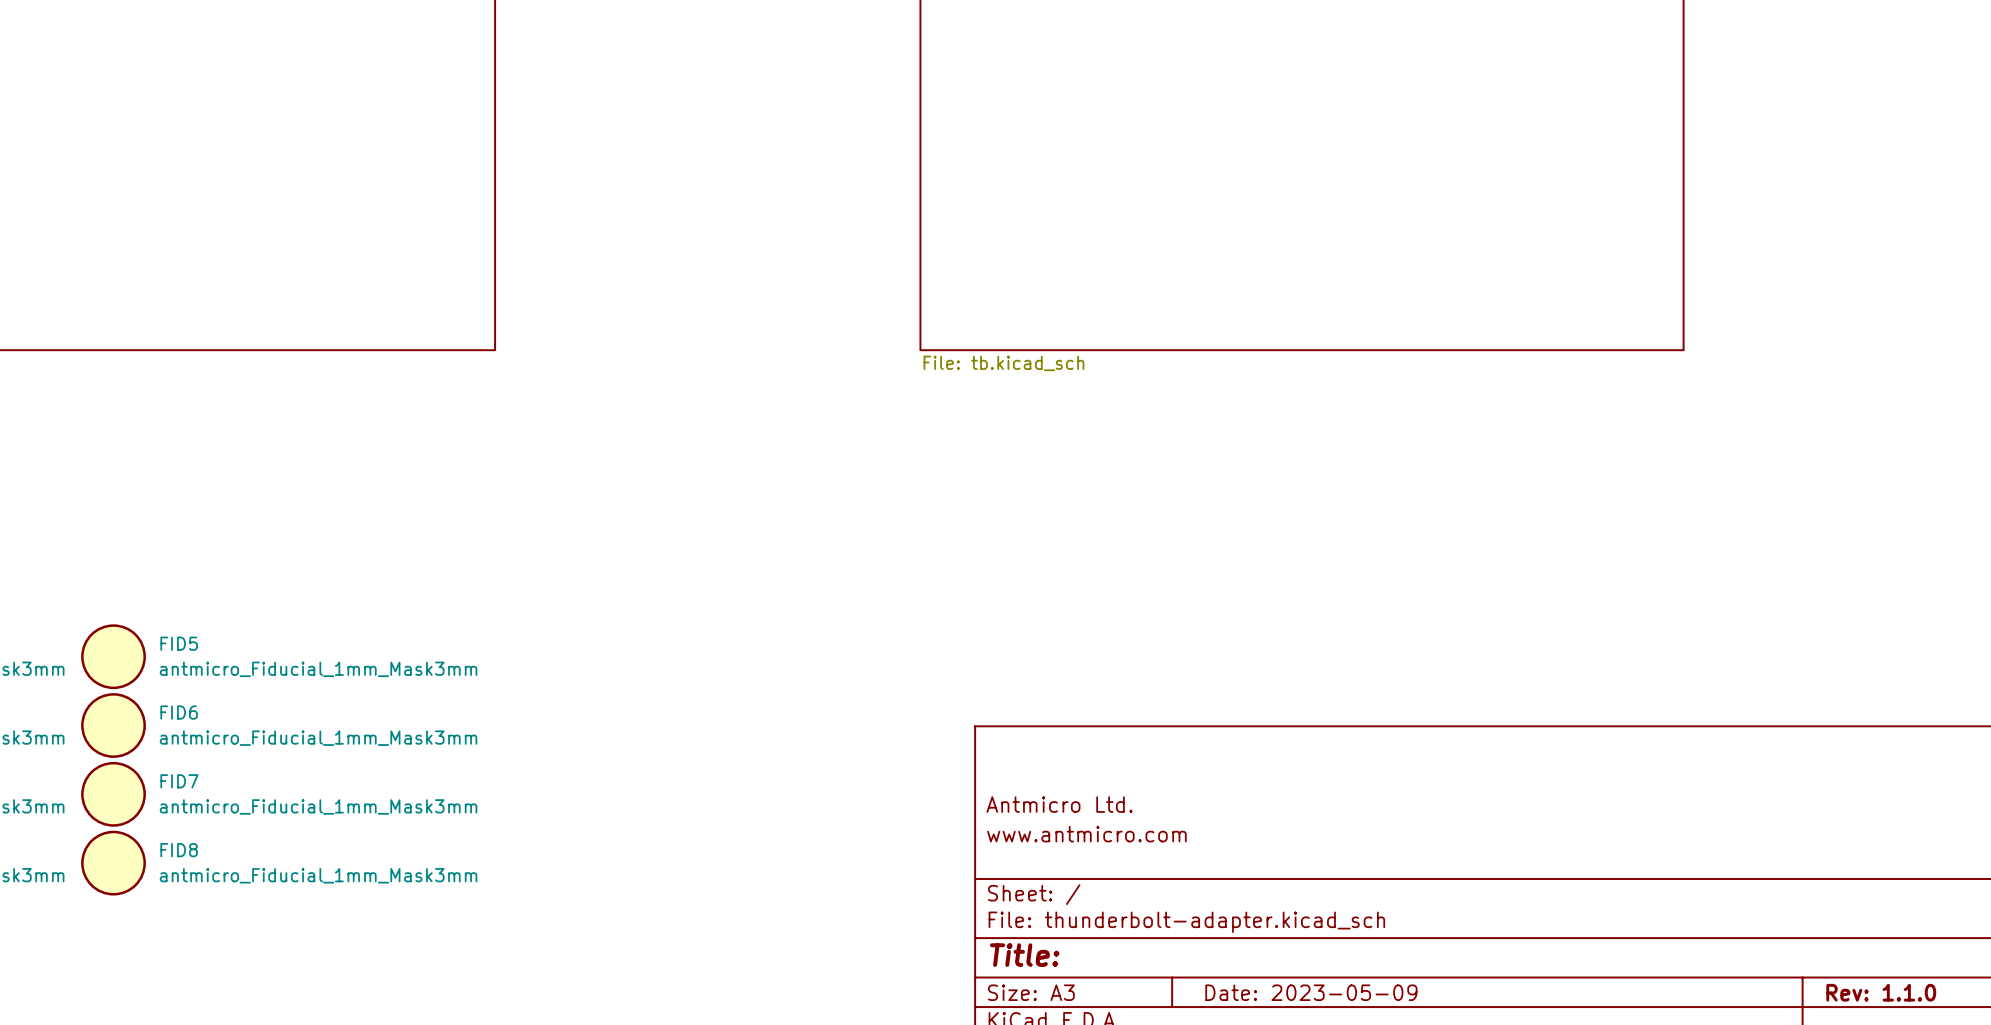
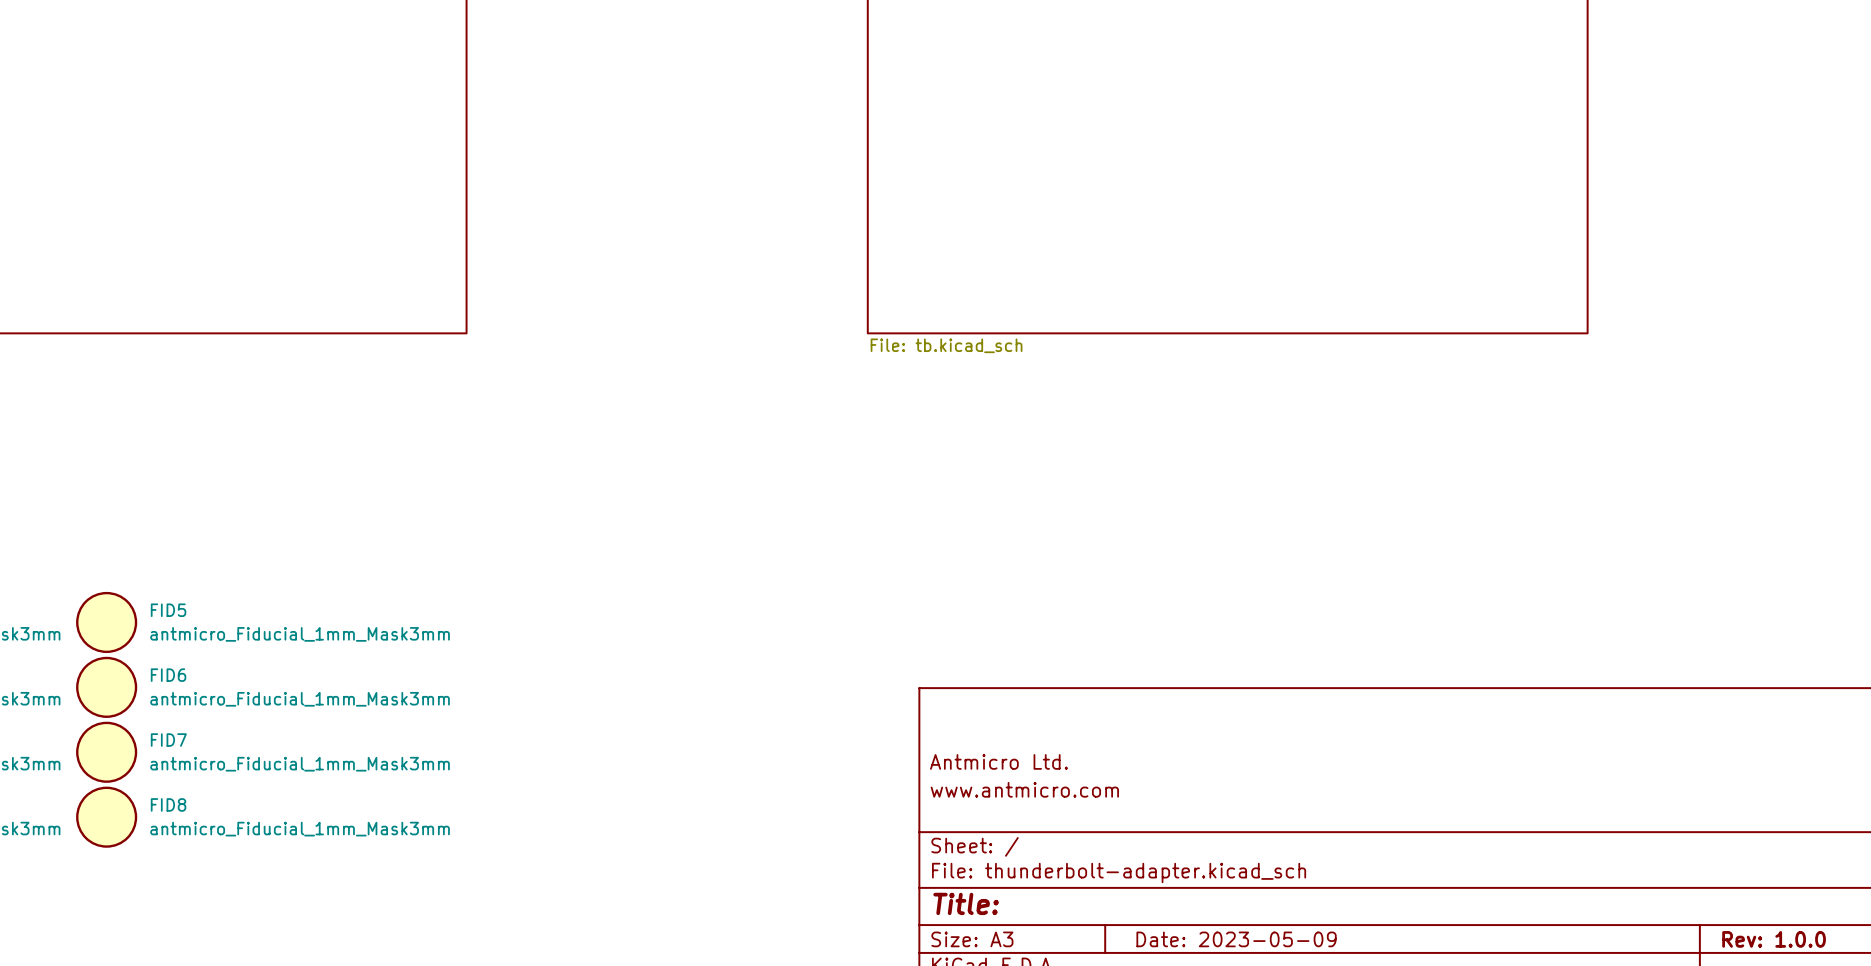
title block: Rev: 1.1.0 (1881, 992) -> Rev: 1.0.0 (1774, 939)

